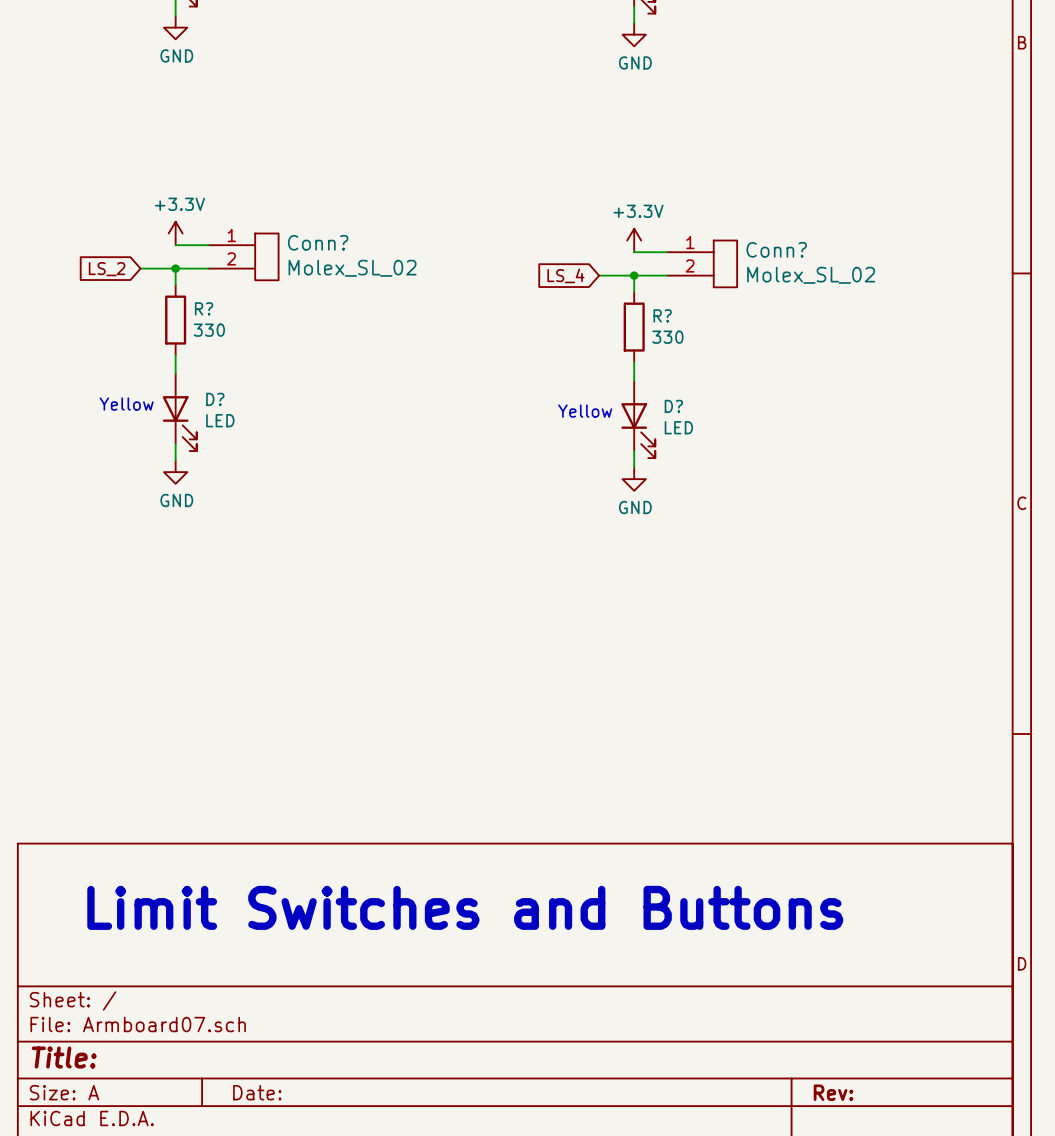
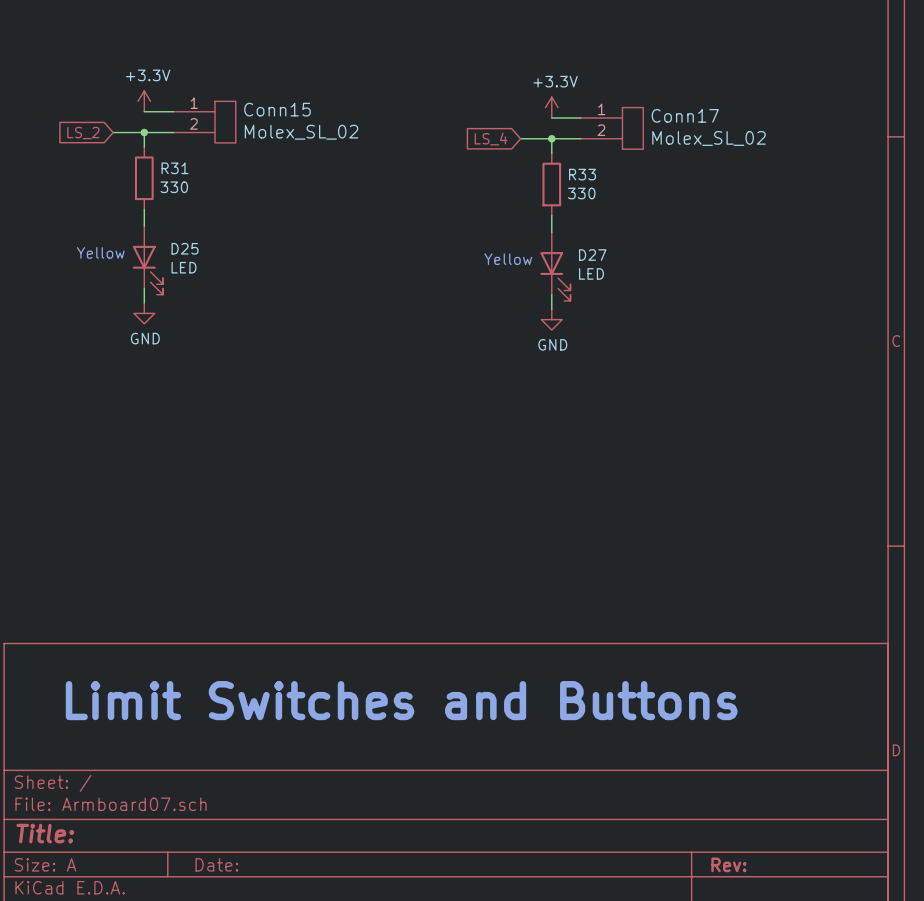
Conn? name: Conn? (318, 242) -> Conn15 (277, 109)
Conn? name: Conn? (776, 249) -> Conn17 (685, 115)
R? name: R? (204, 308) -> R31 (175, 168)
R? name: R? (662, 315) -> R33 (582, 174)
D? name: D? (215, 399) -> D25 (185, 248)
D? name: D? (673, 406) -> D27 (592, 255)

